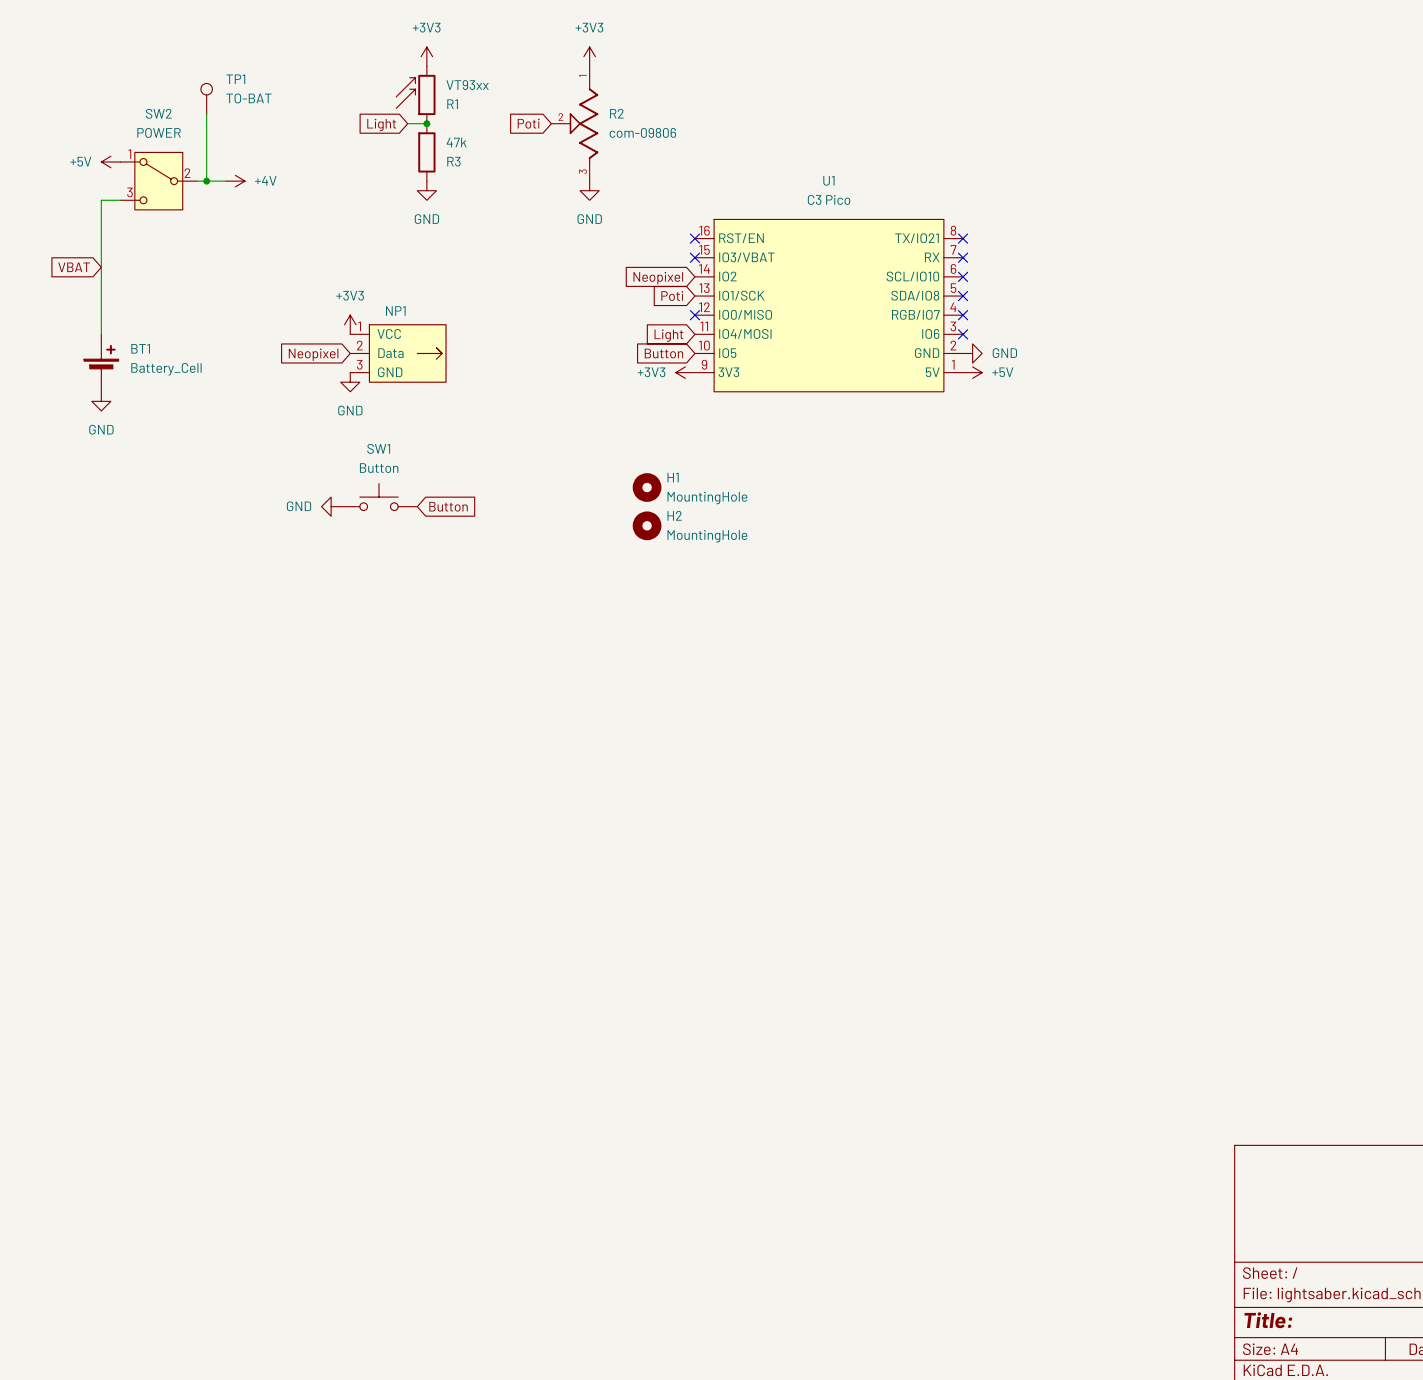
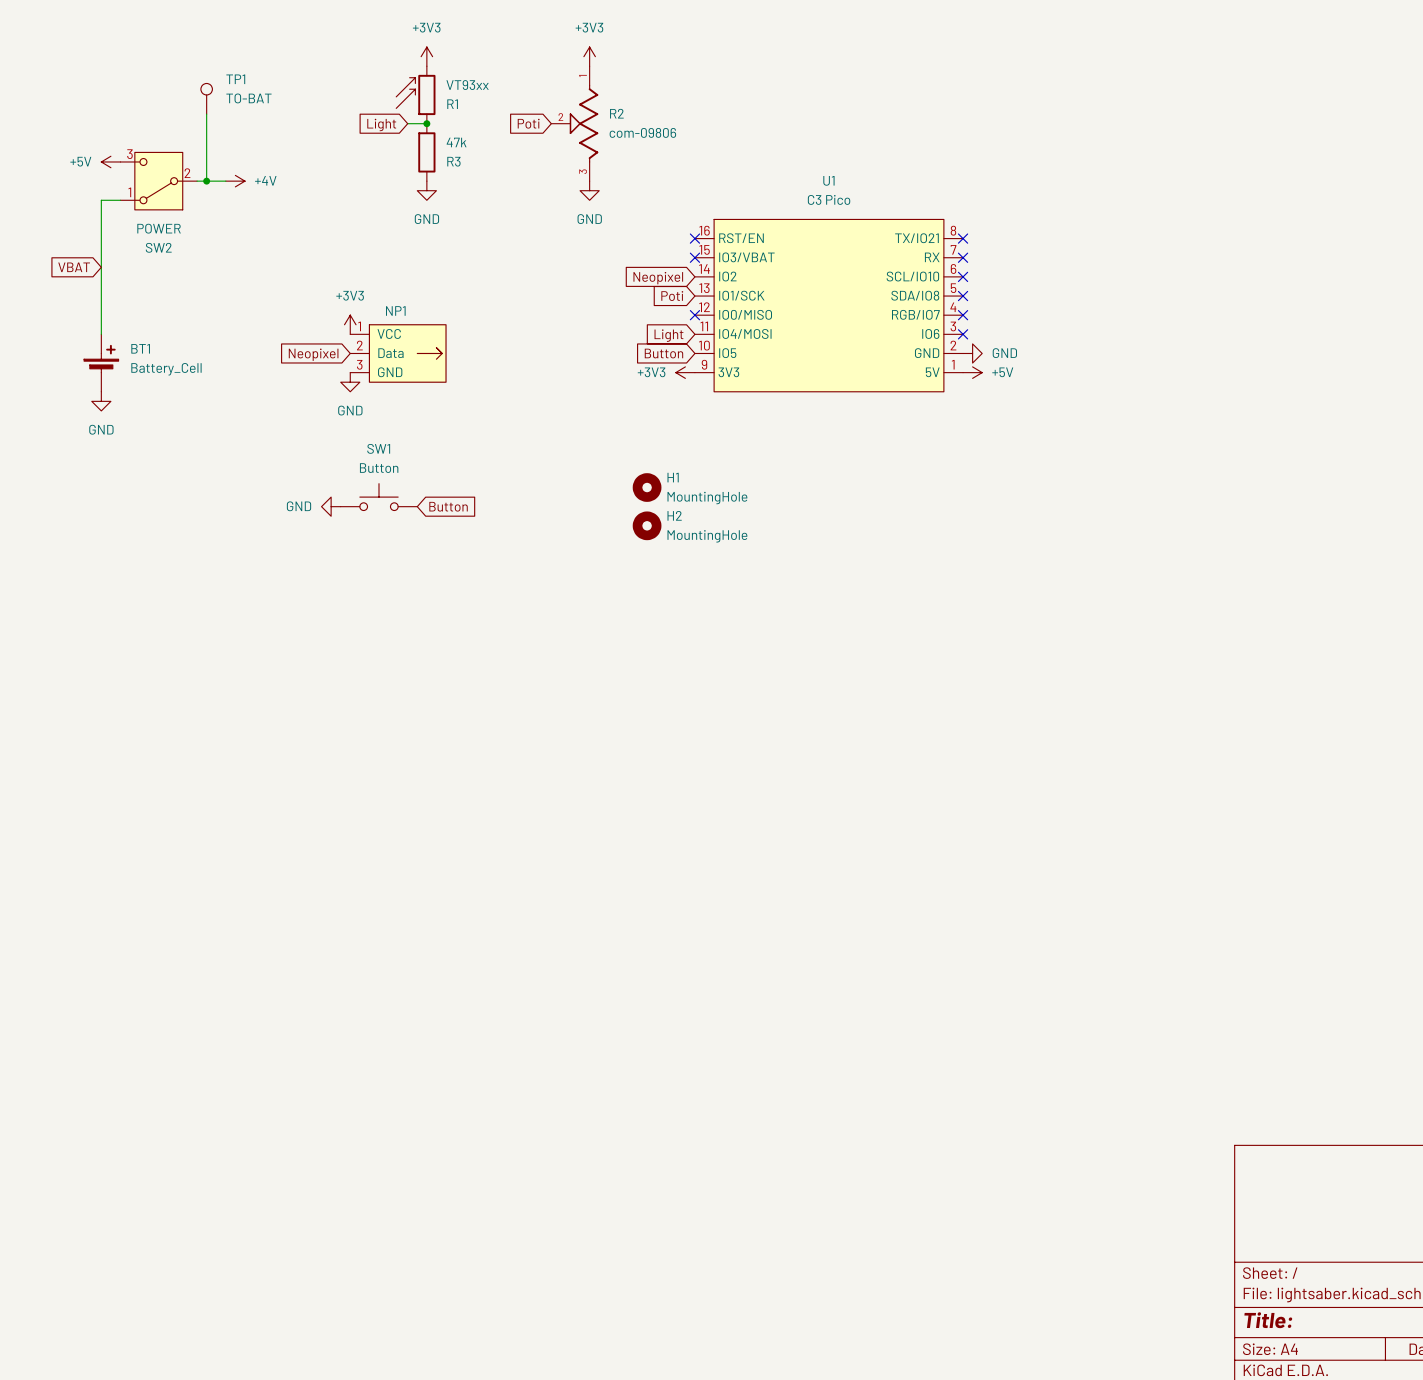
SW2 flip: as is (158, 181) -> up-down (158, 181)

